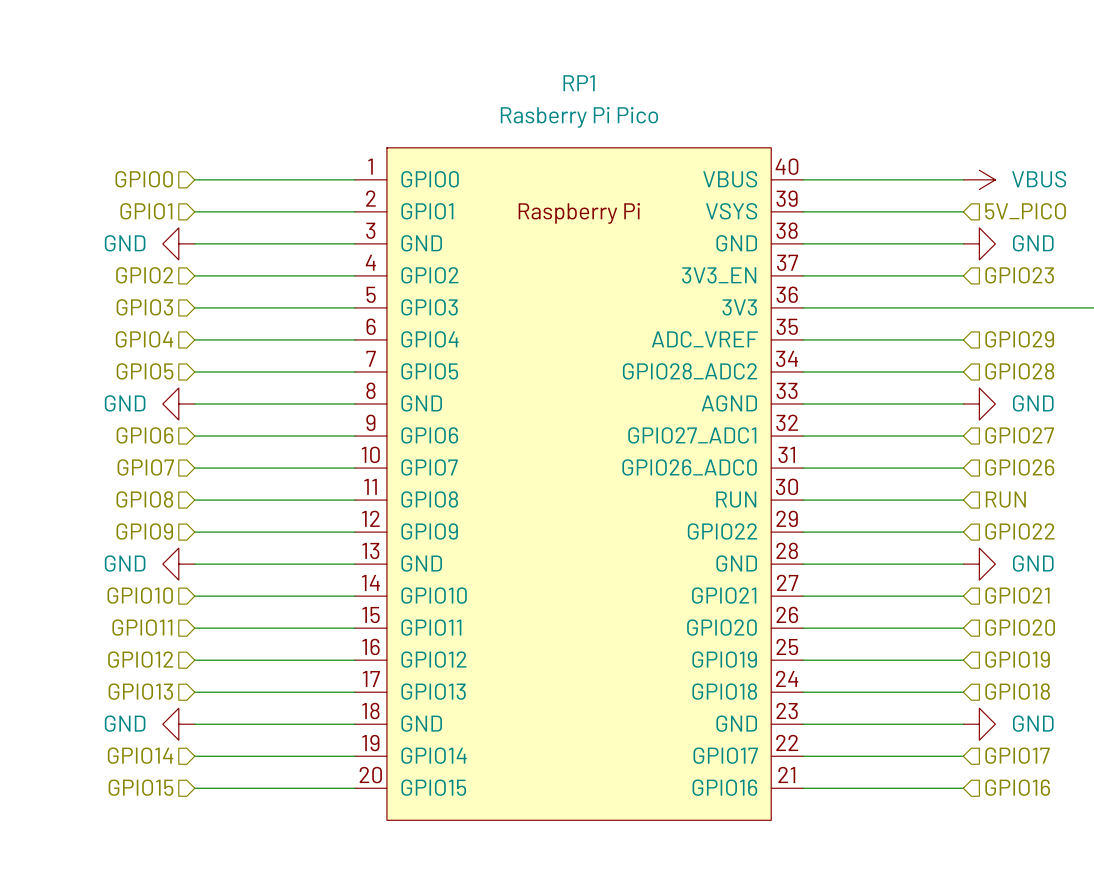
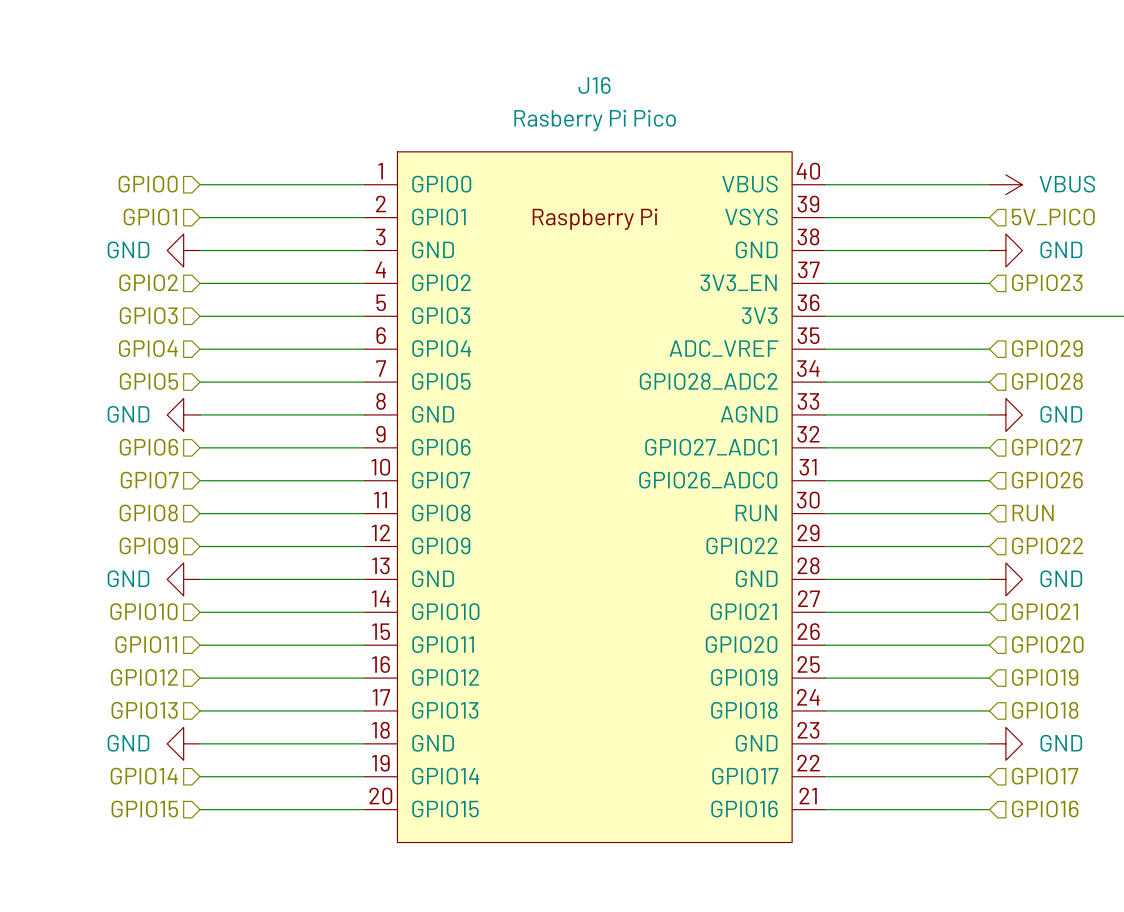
RP1 name: RP1 (579, 83) -> J16 (594, 85)

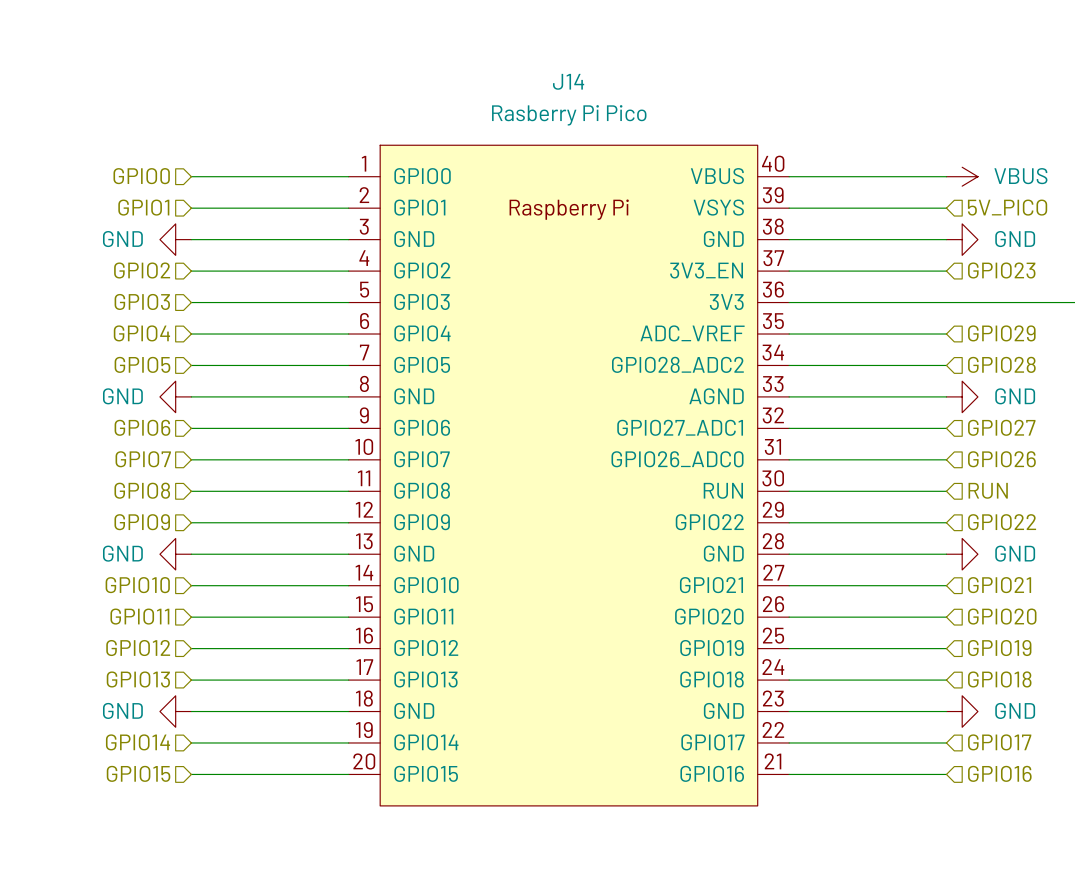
J16 name: J16 (594, 85) -> J14 (568, 81)

